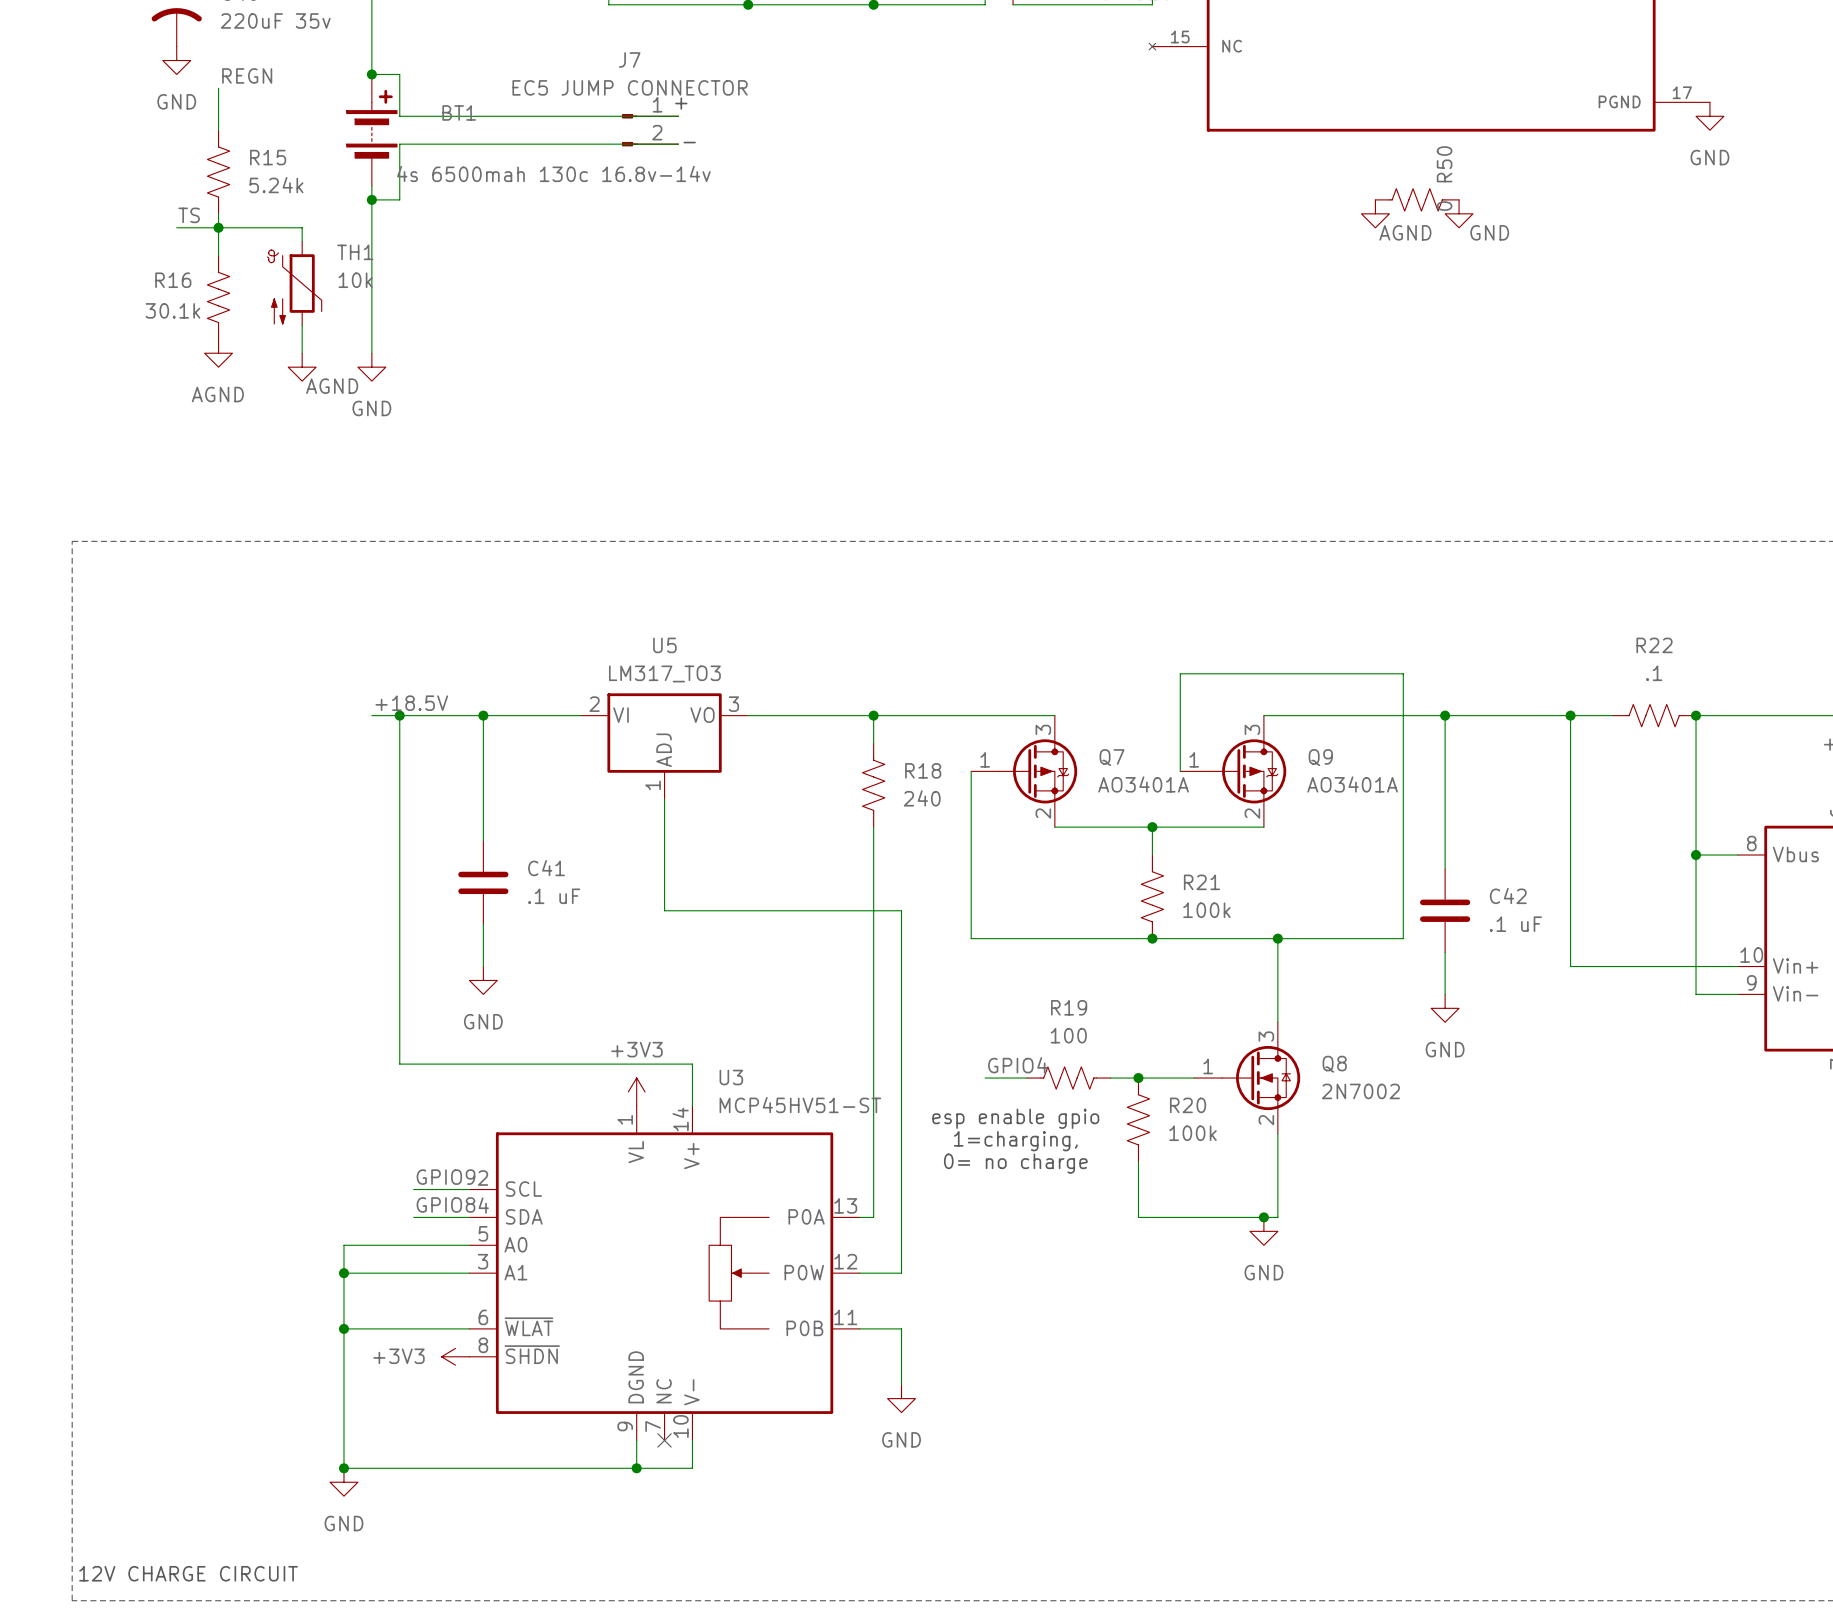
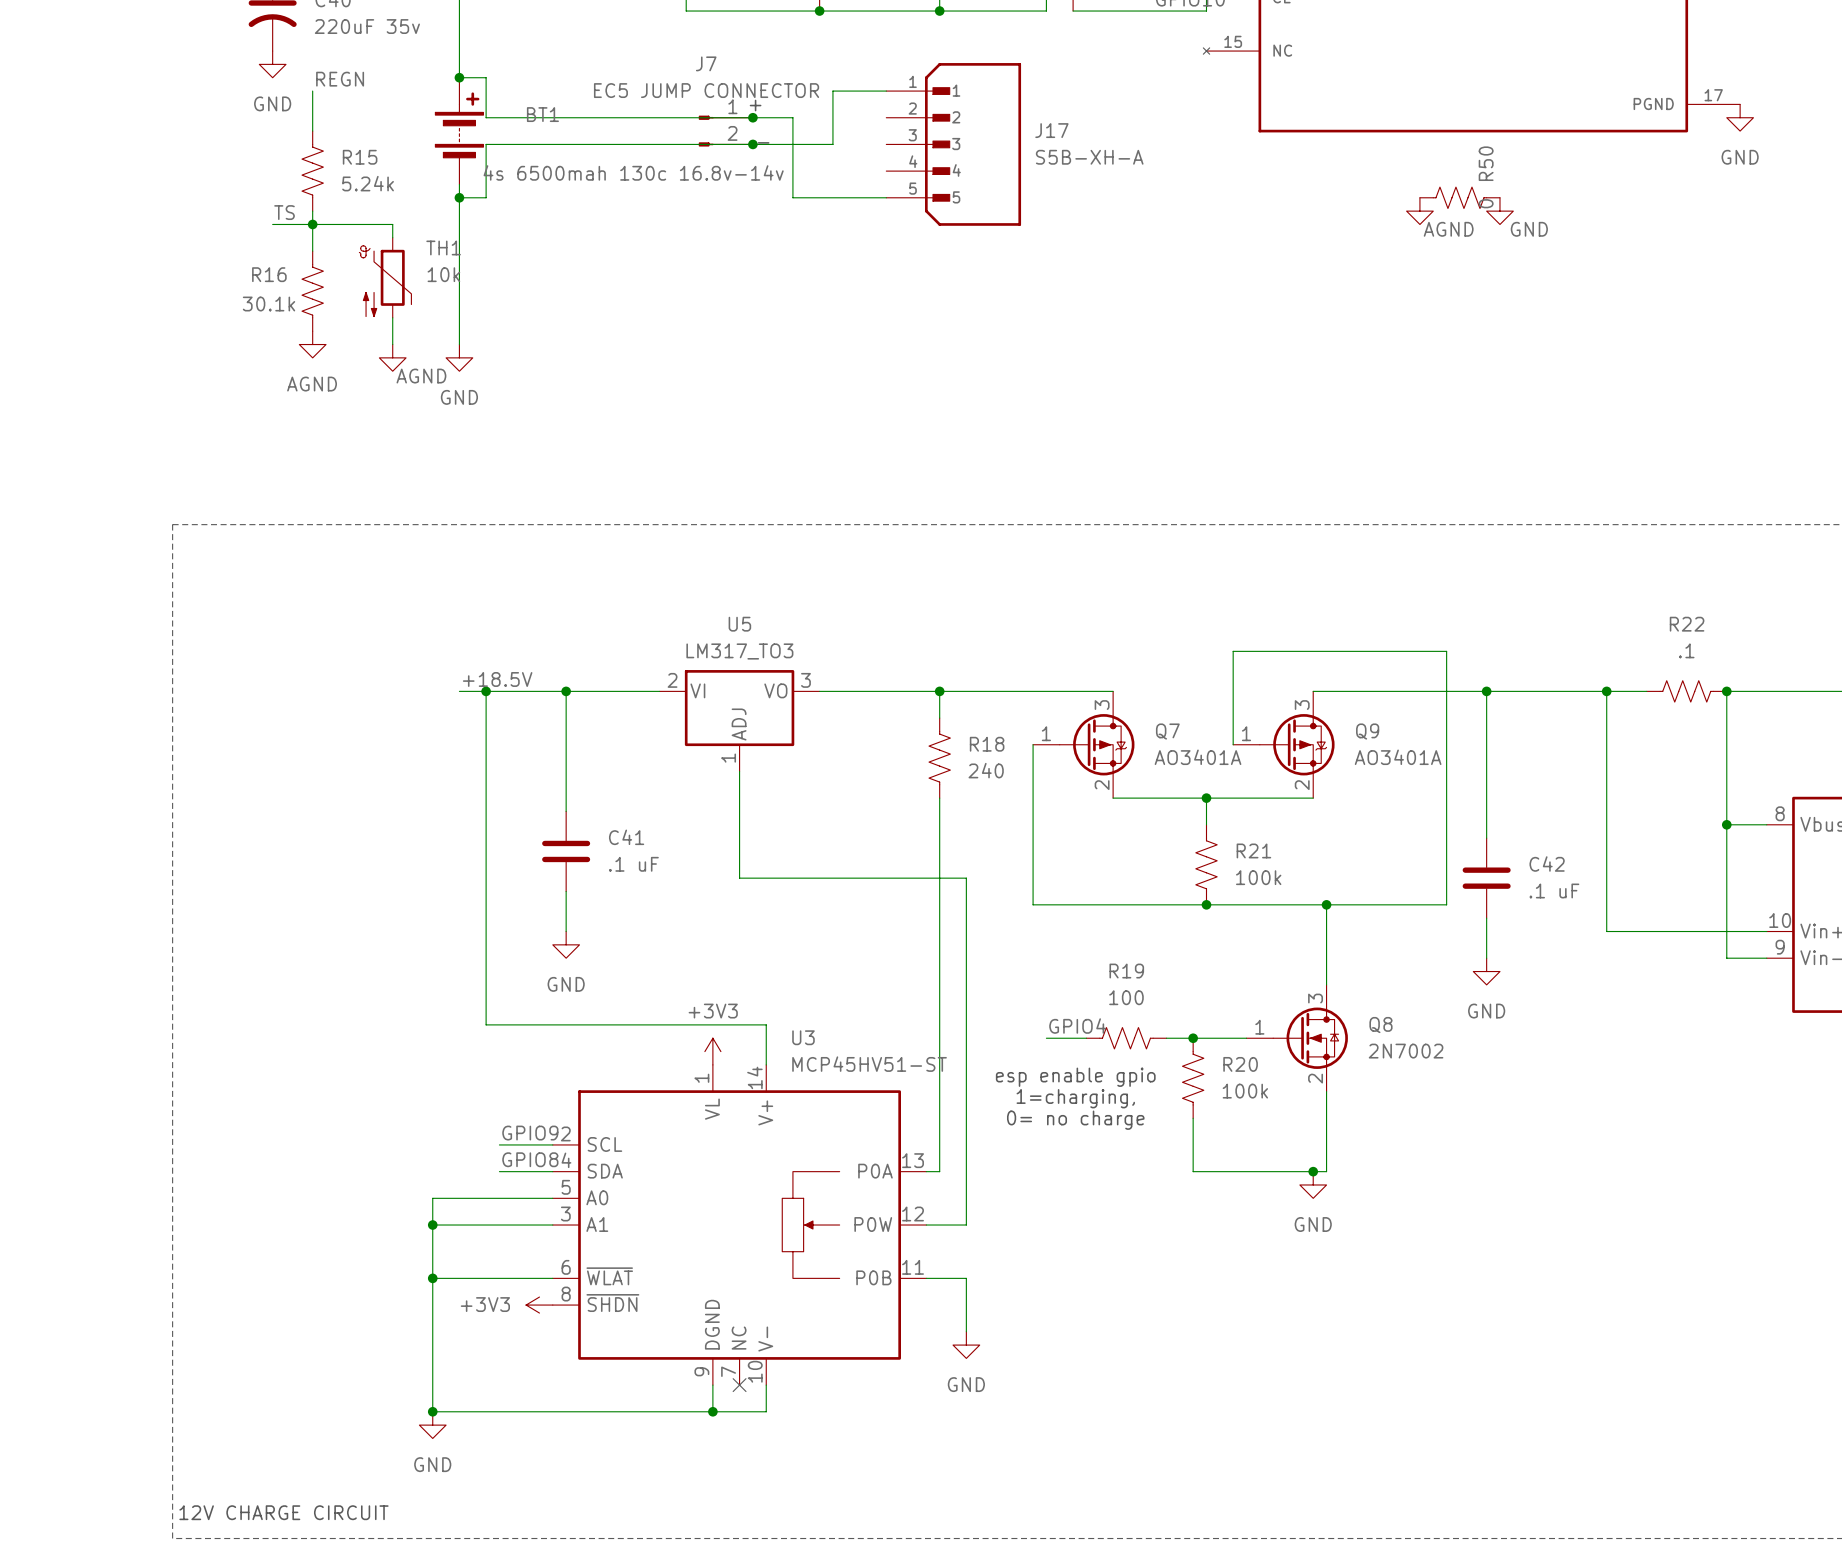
wire: none -> (886, 91) (832, 91) (832, 144) (752, 144)
wire: none -> (752, 117) (792, 117) (792, 197) (886, 197)
junction: none -> (752, 117)
junction: none -> (752, 144)
J17: none -> S5B-XH-A (953, 144)

